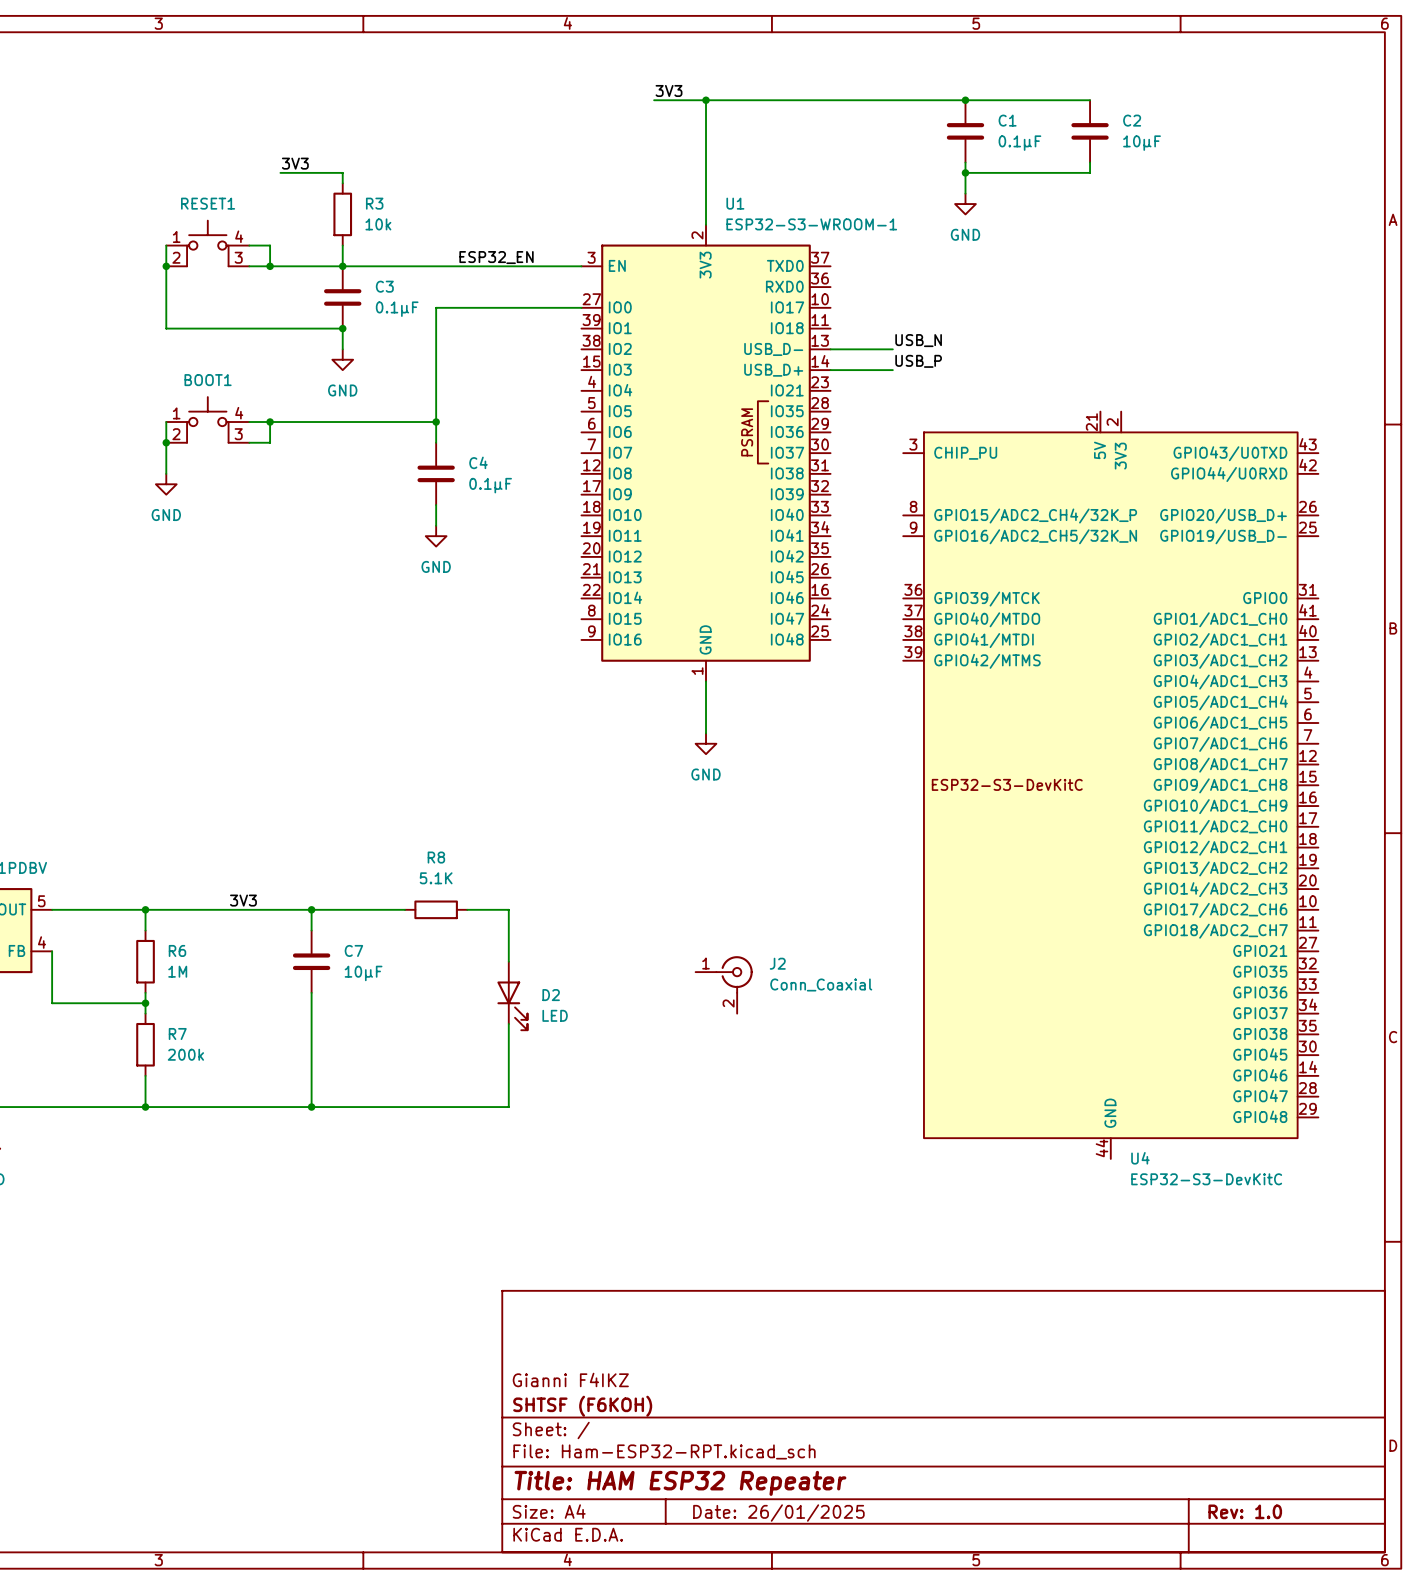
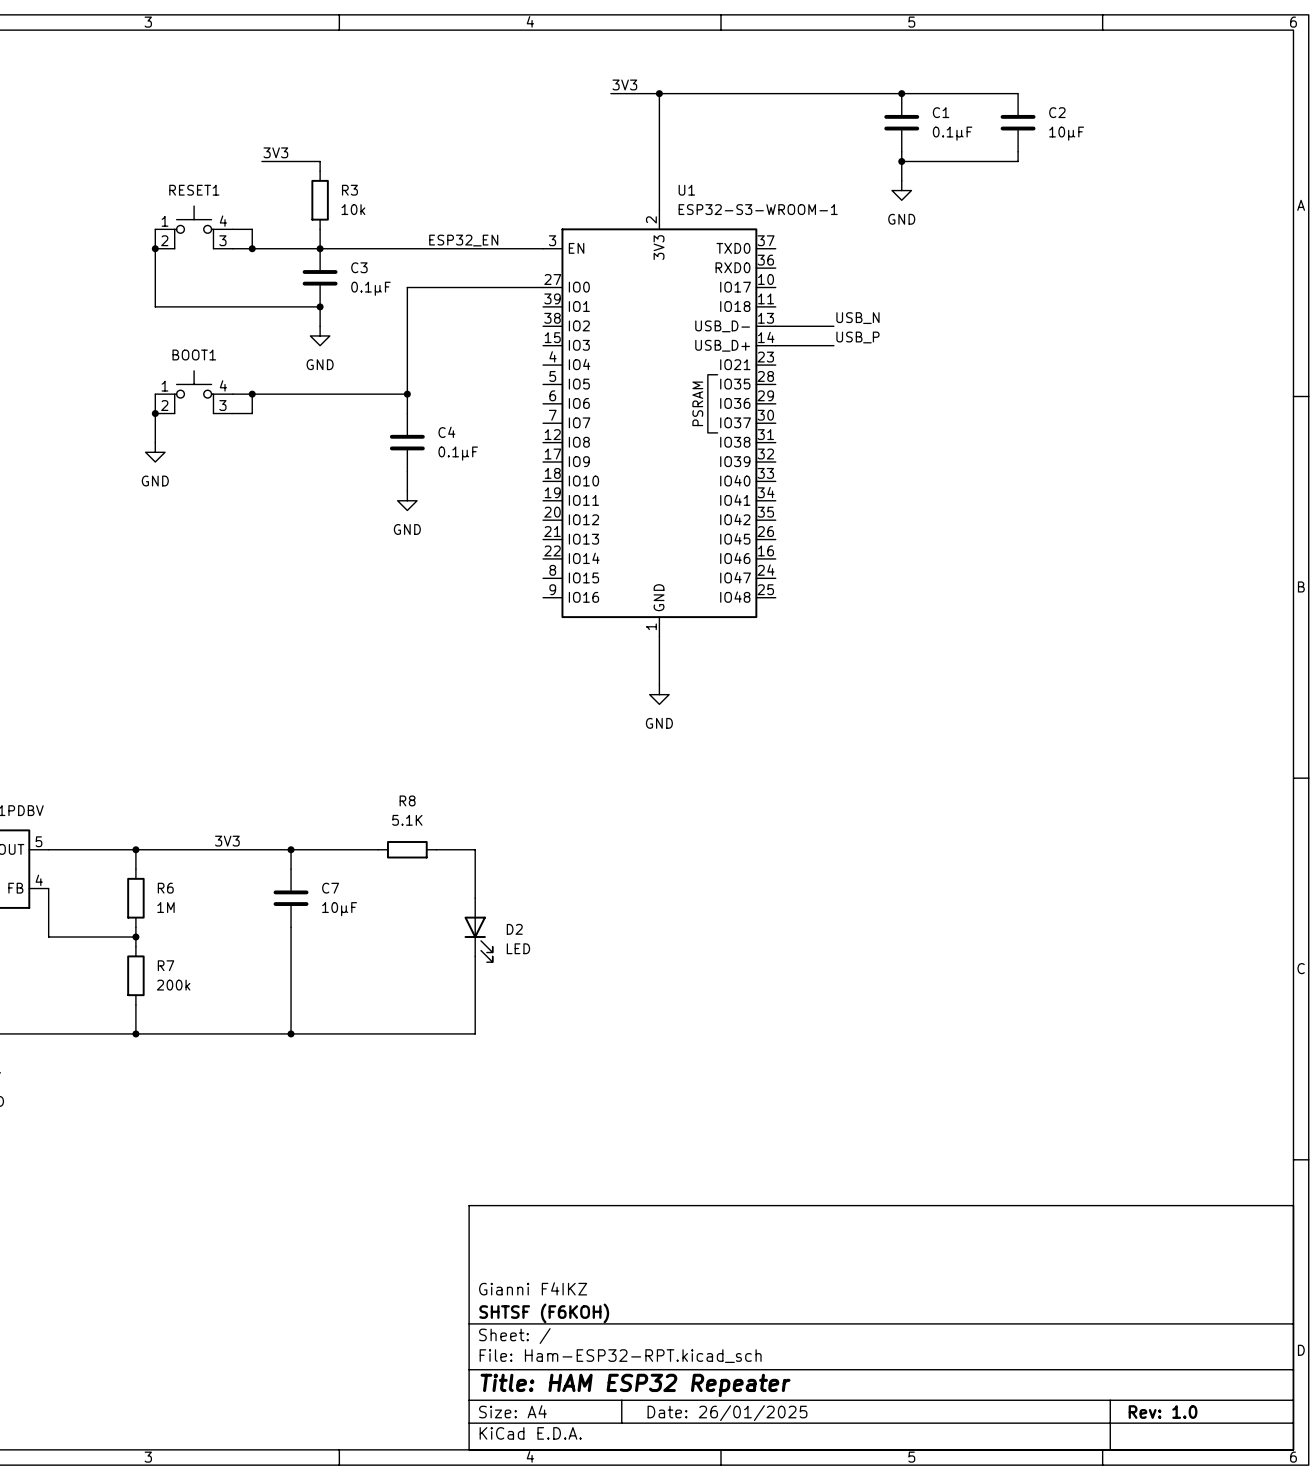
U4: ESP32-S3-DevKitC (1110, 785) -> none
J2: Conn_Coaxial (724, 984) -> none

